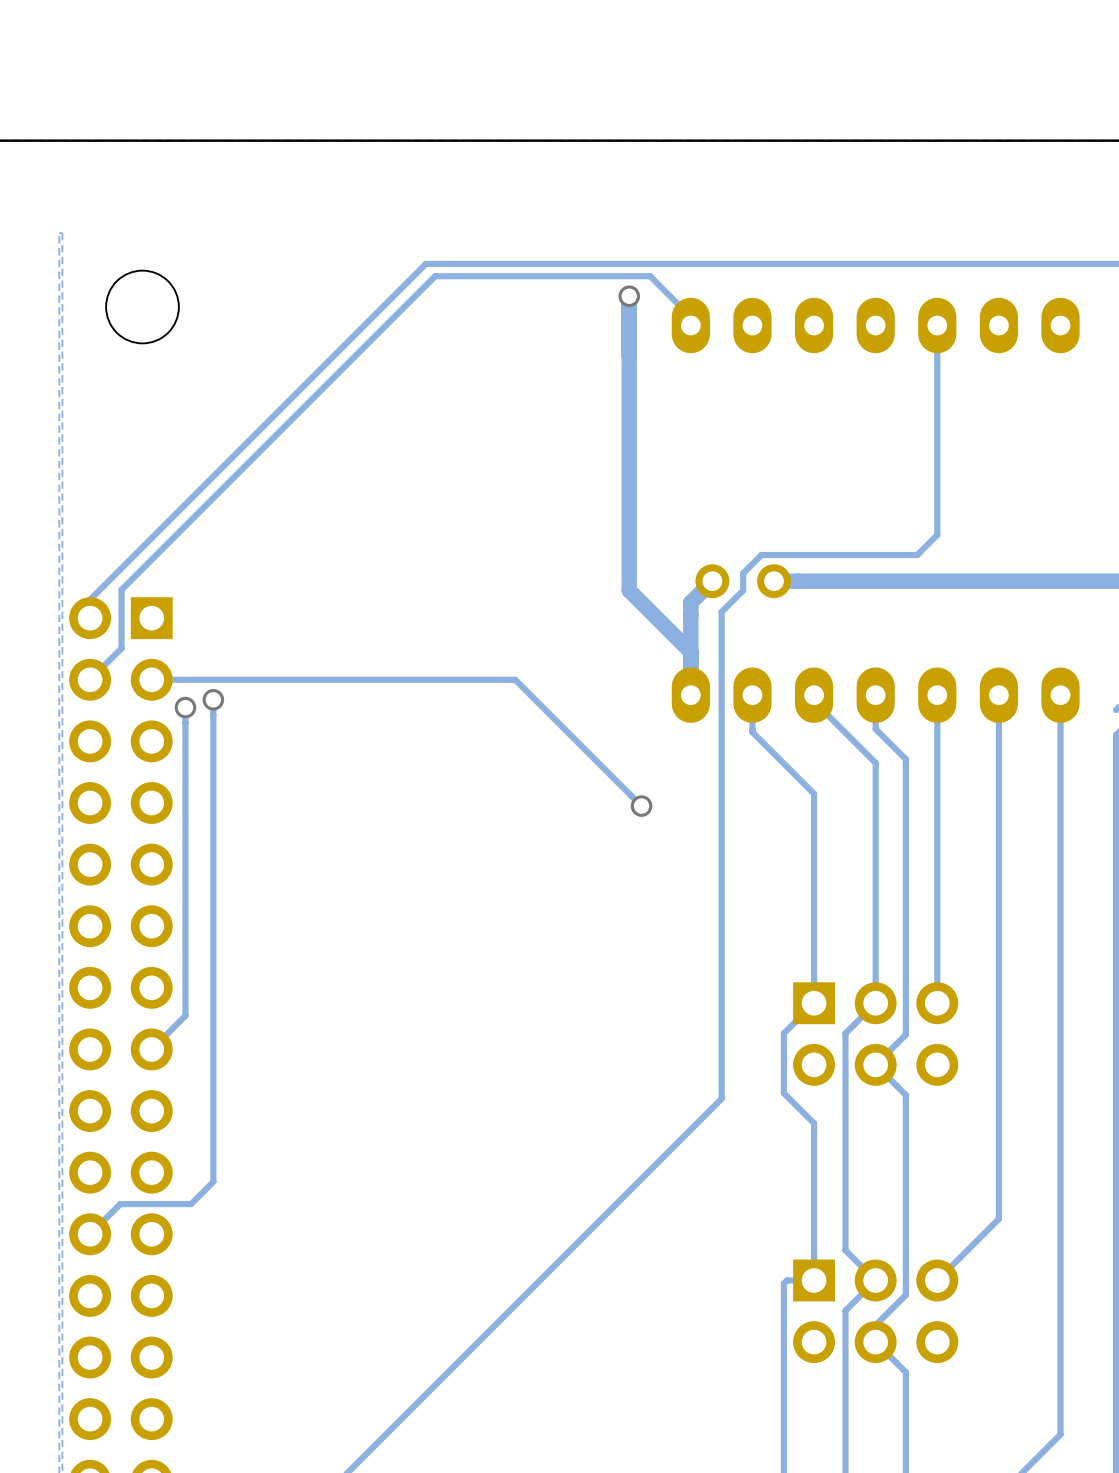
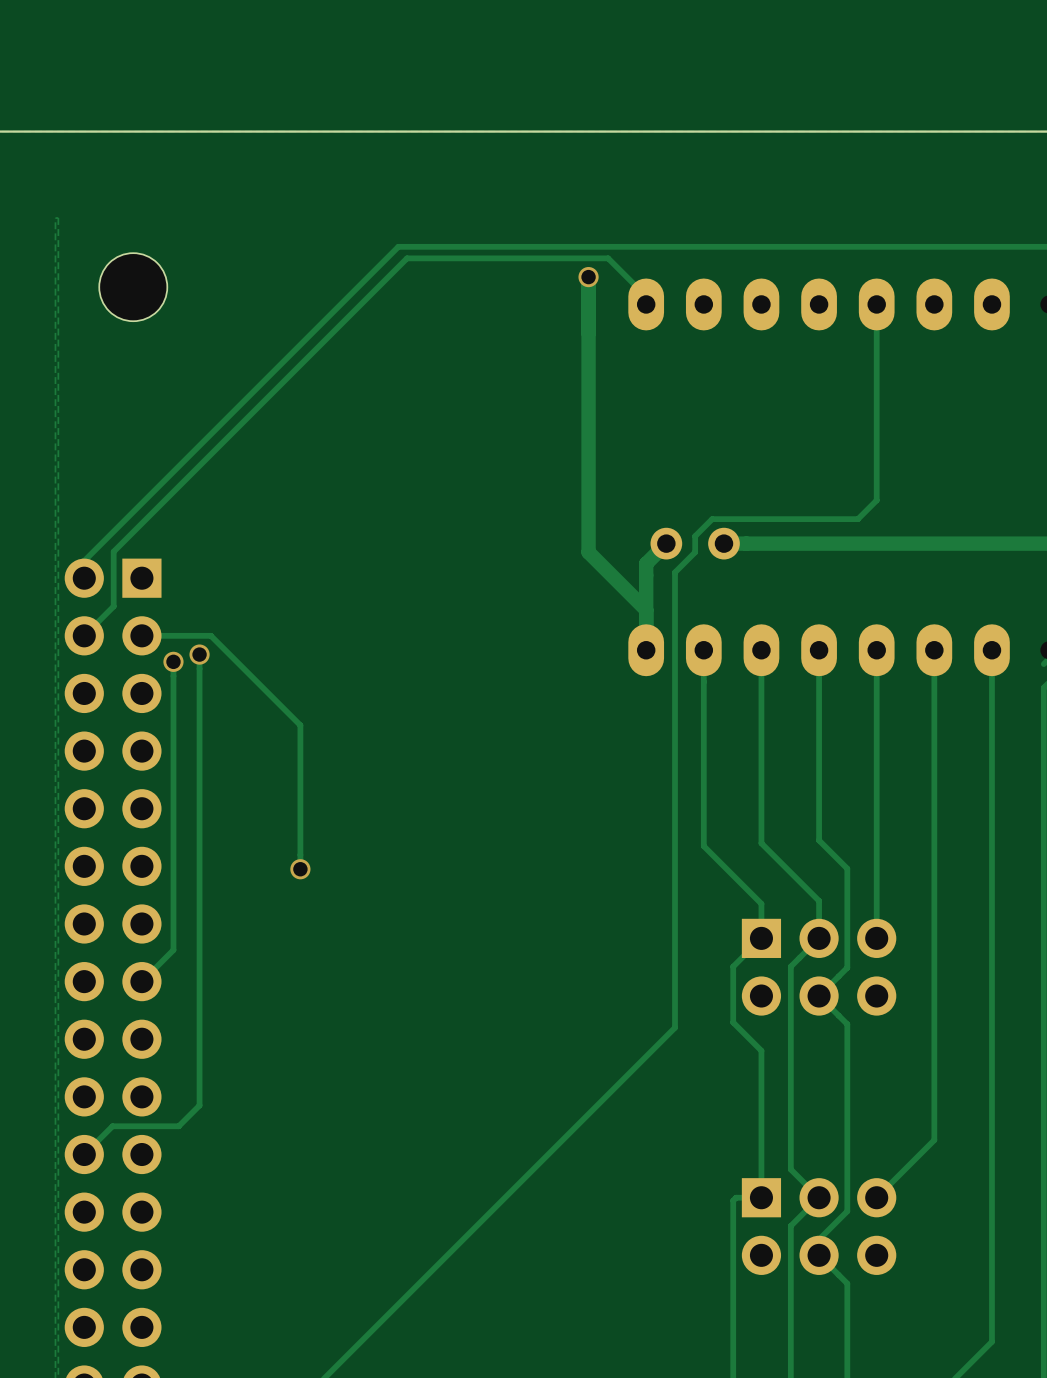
track: (225, 679) (515, 679) (641, 806) -> (210, 635) (300, 725) (300, 869)
track: (814, 701) (875, 762) -> (819, 681) (819, 713)
track: (875, 729) (905, 759) (905, 928) -> none
track: (752, 732) (814, 793) -> (761, 656) (761, 742)
track: none -> (703, 684) (703, 846) (761, 903)
via: (641, 806) -> none
track: (875, 898) (875, 963) -> (819, 840) (847, 868)
track: (814, 901) (814, 966) -> (761, 843) (819, 900)
via: none -> (300, 869)

